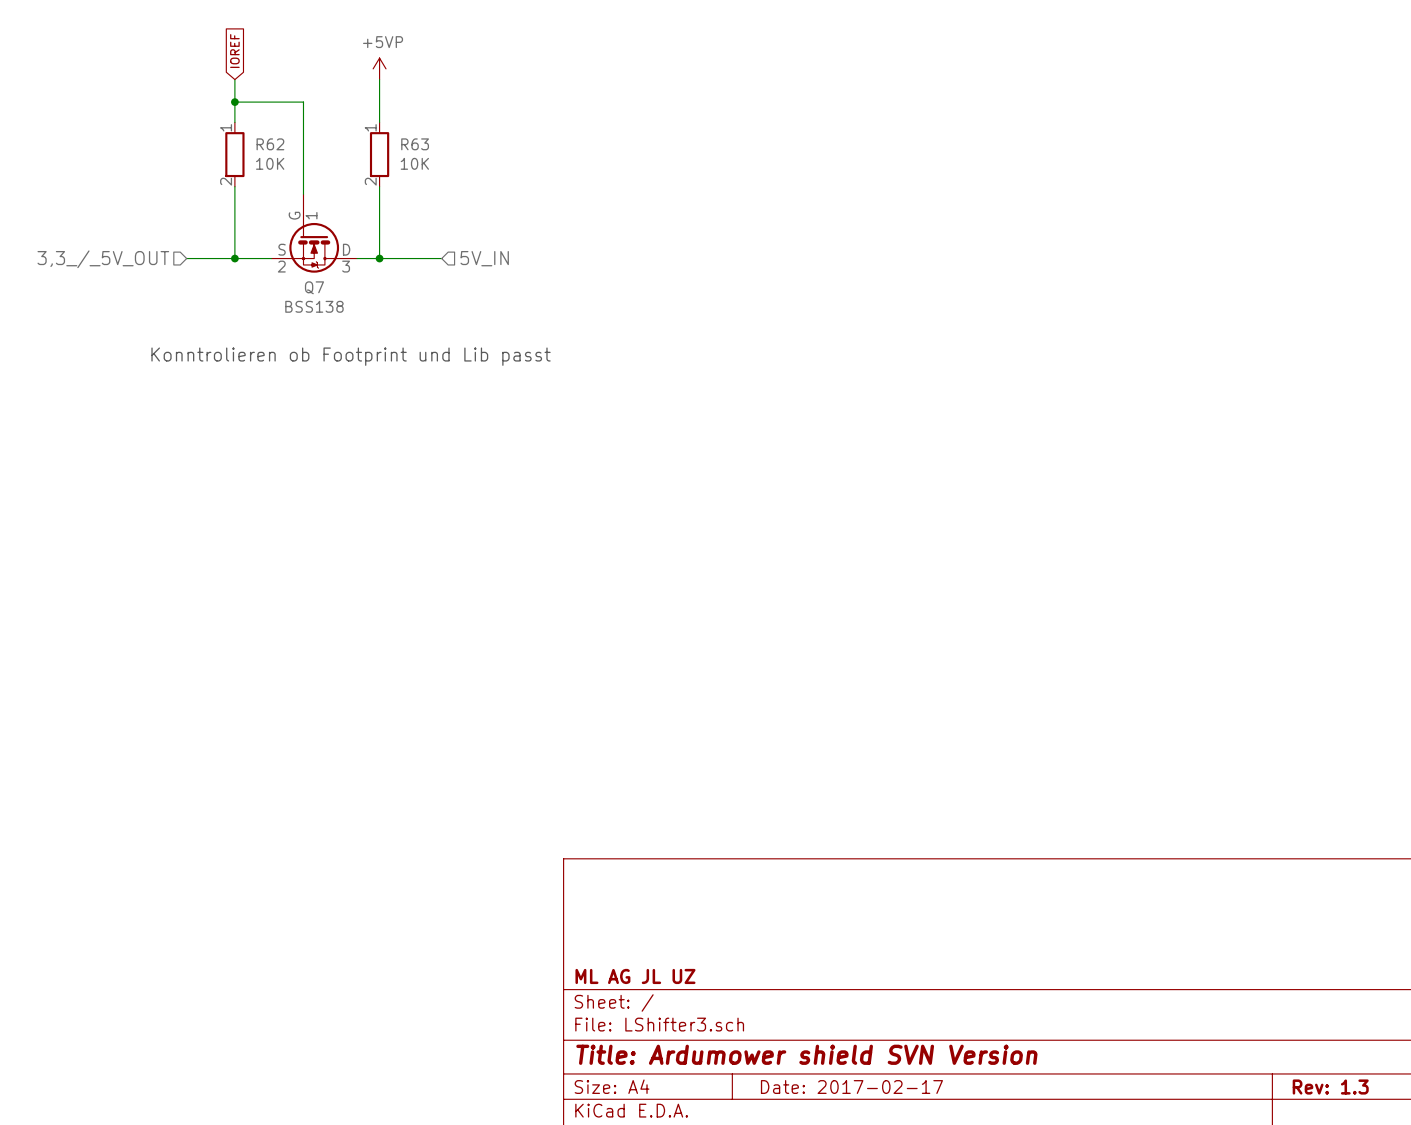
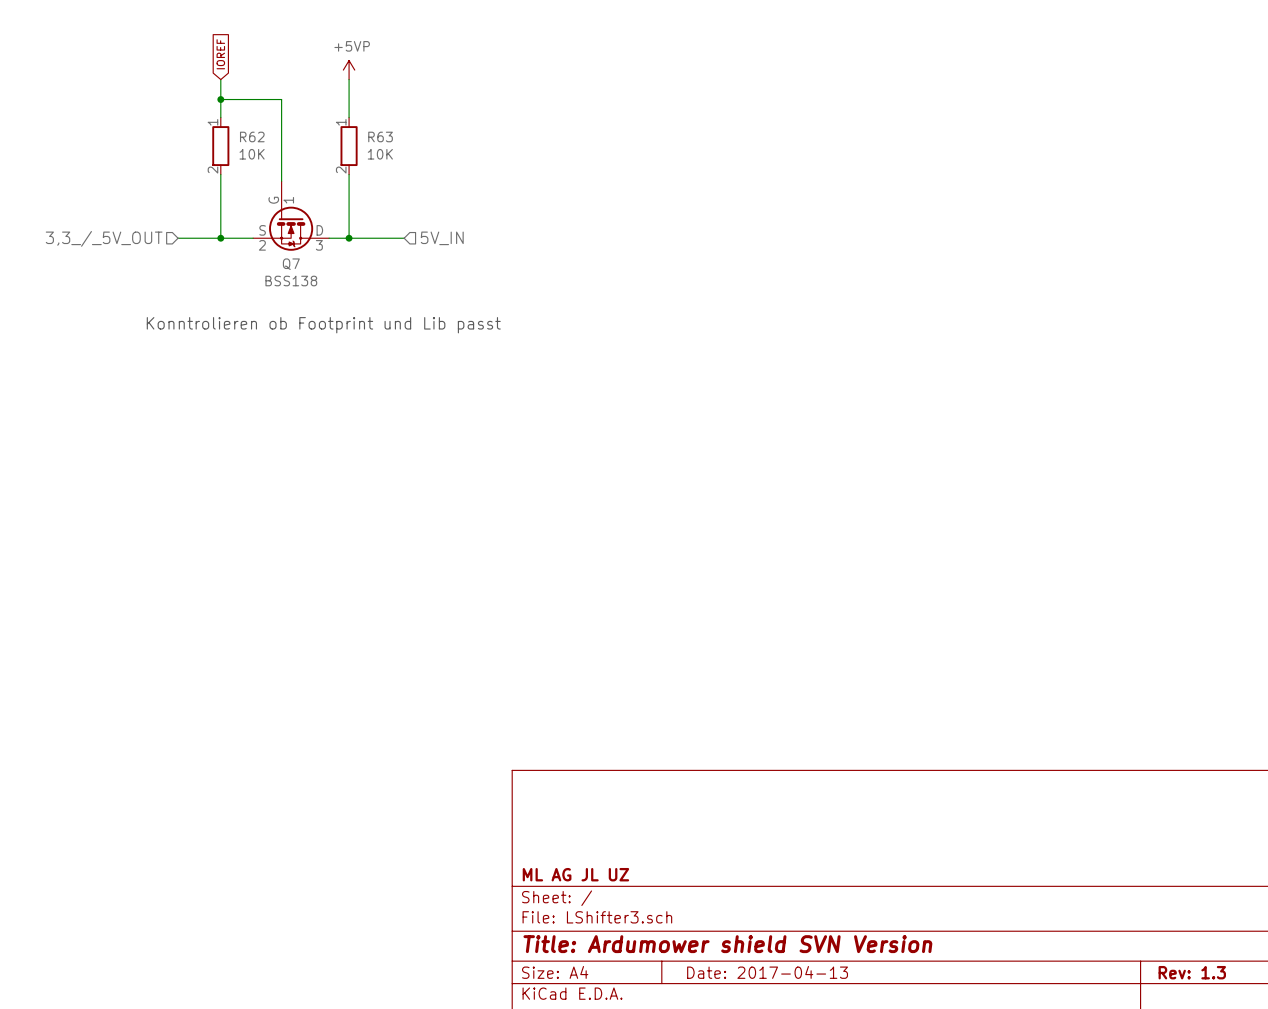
title block: Date: 2017-02-17 (851, 1087) -> Date: 2017-04-13 (767, 972)

